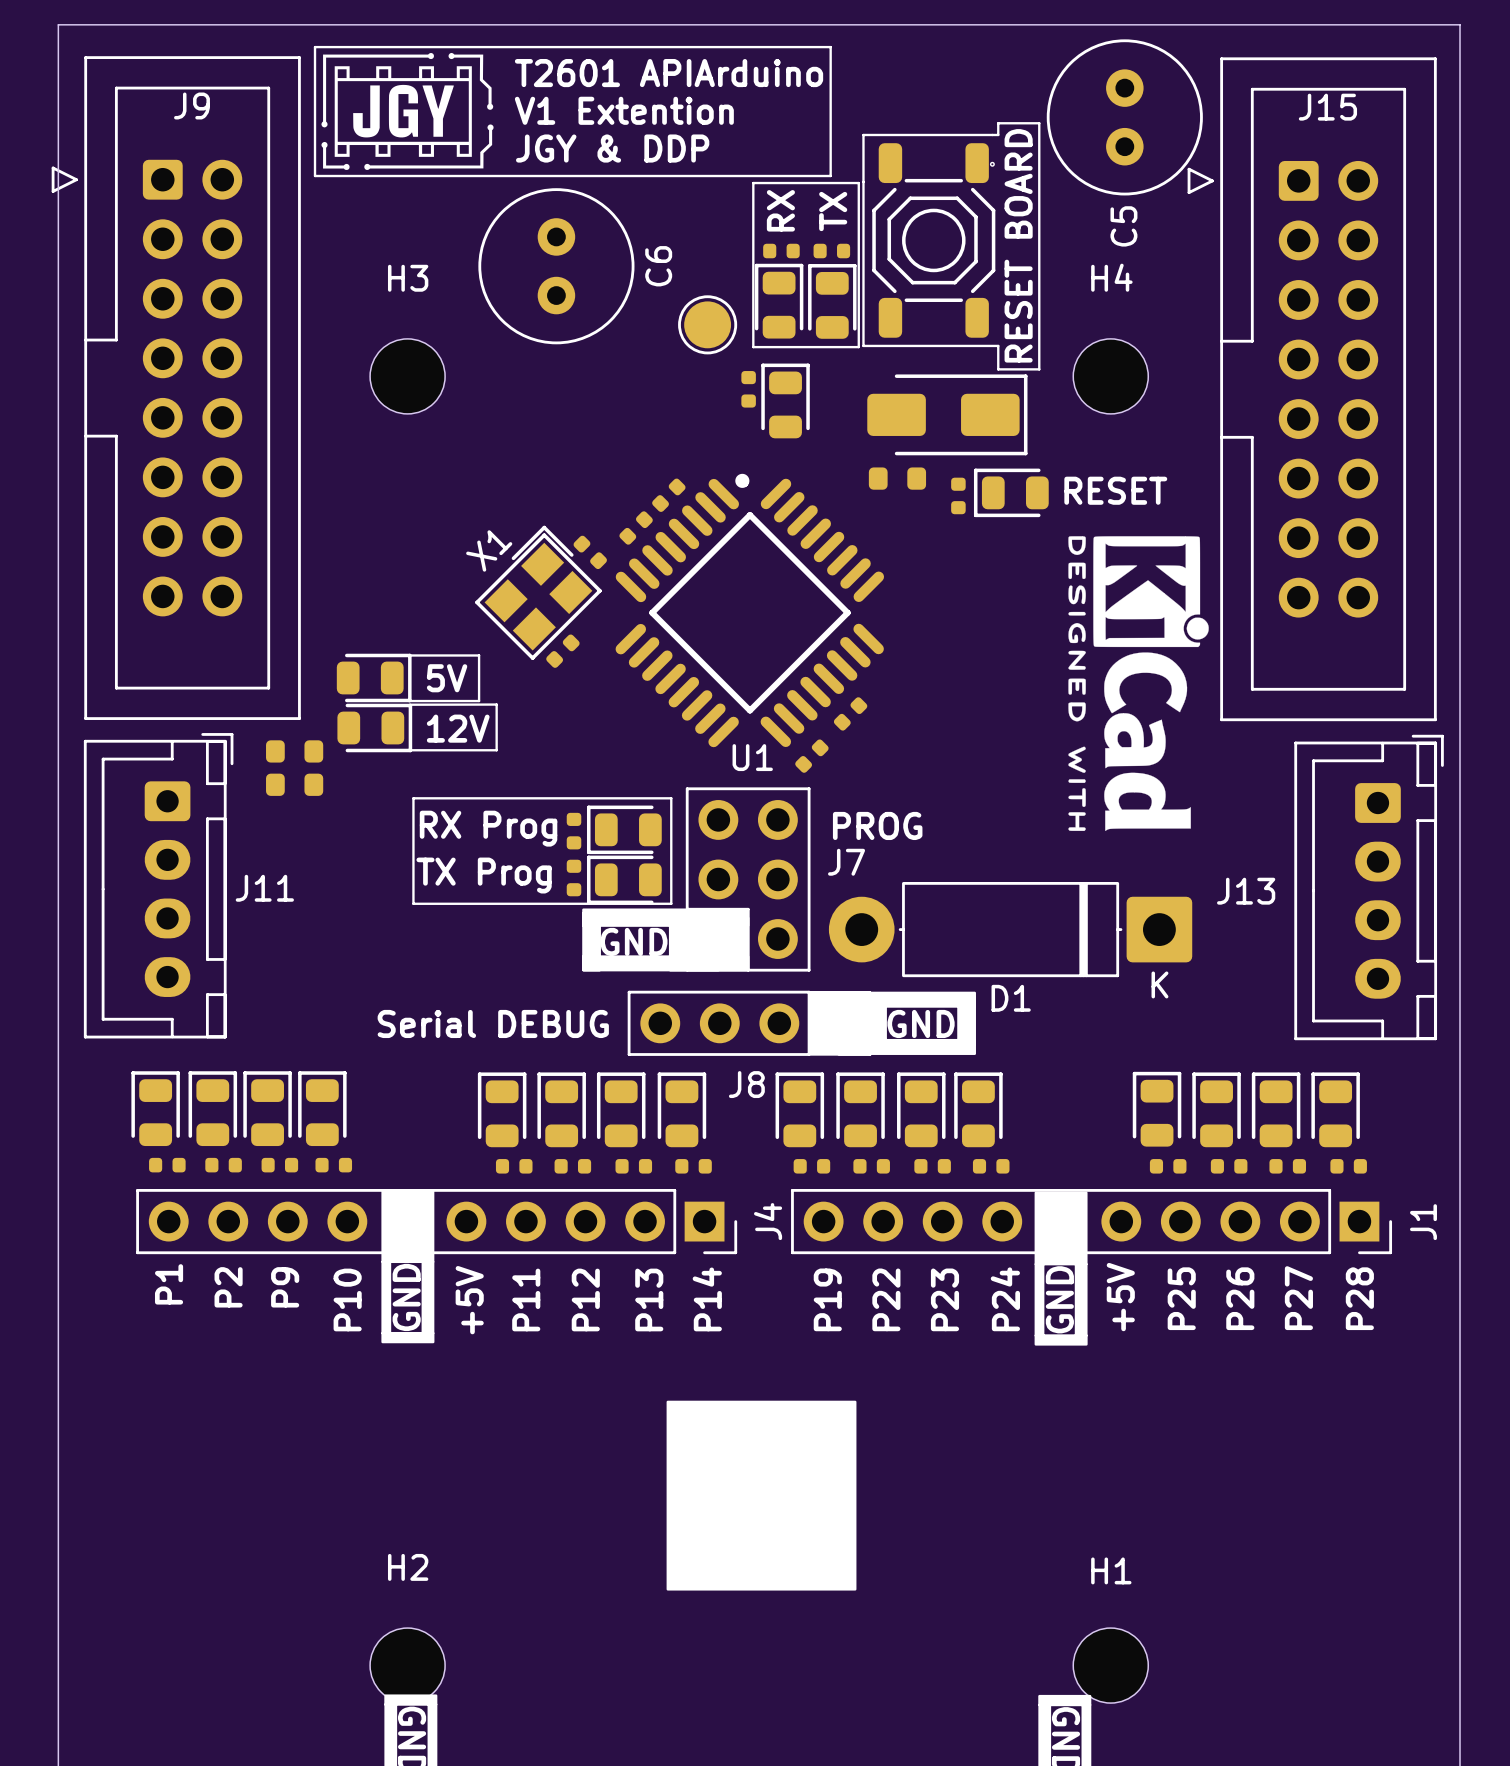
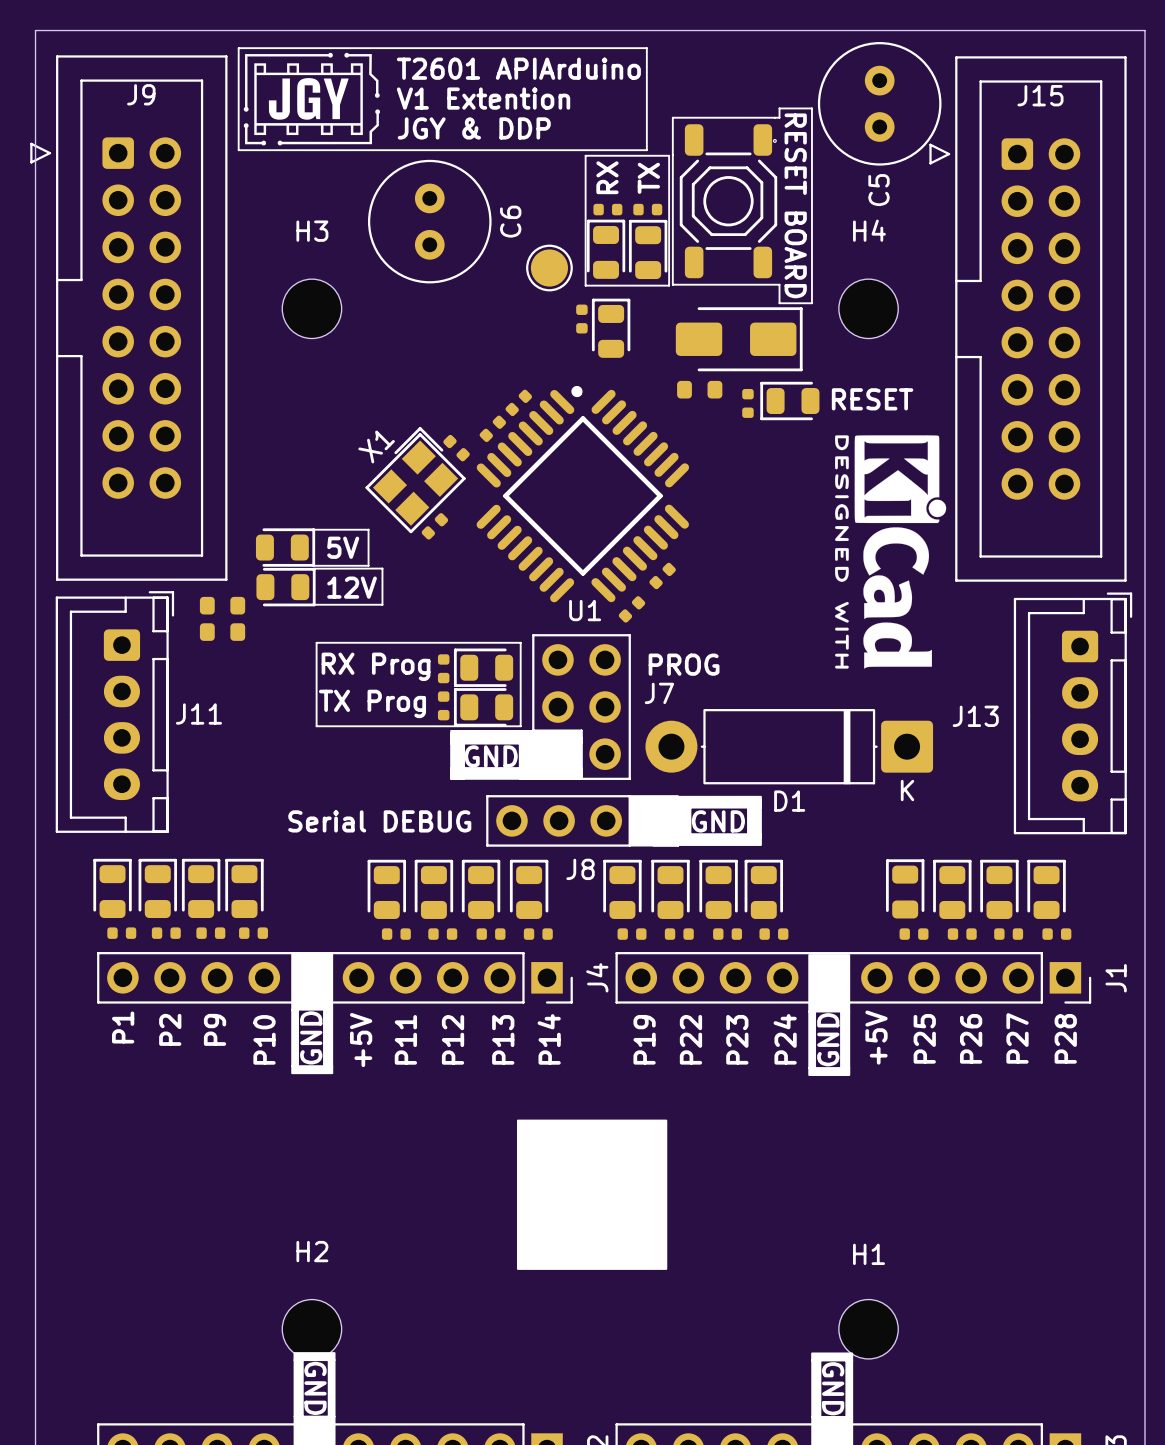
text rotation: 0° (1018, 245) -> 180° (795, 205)

